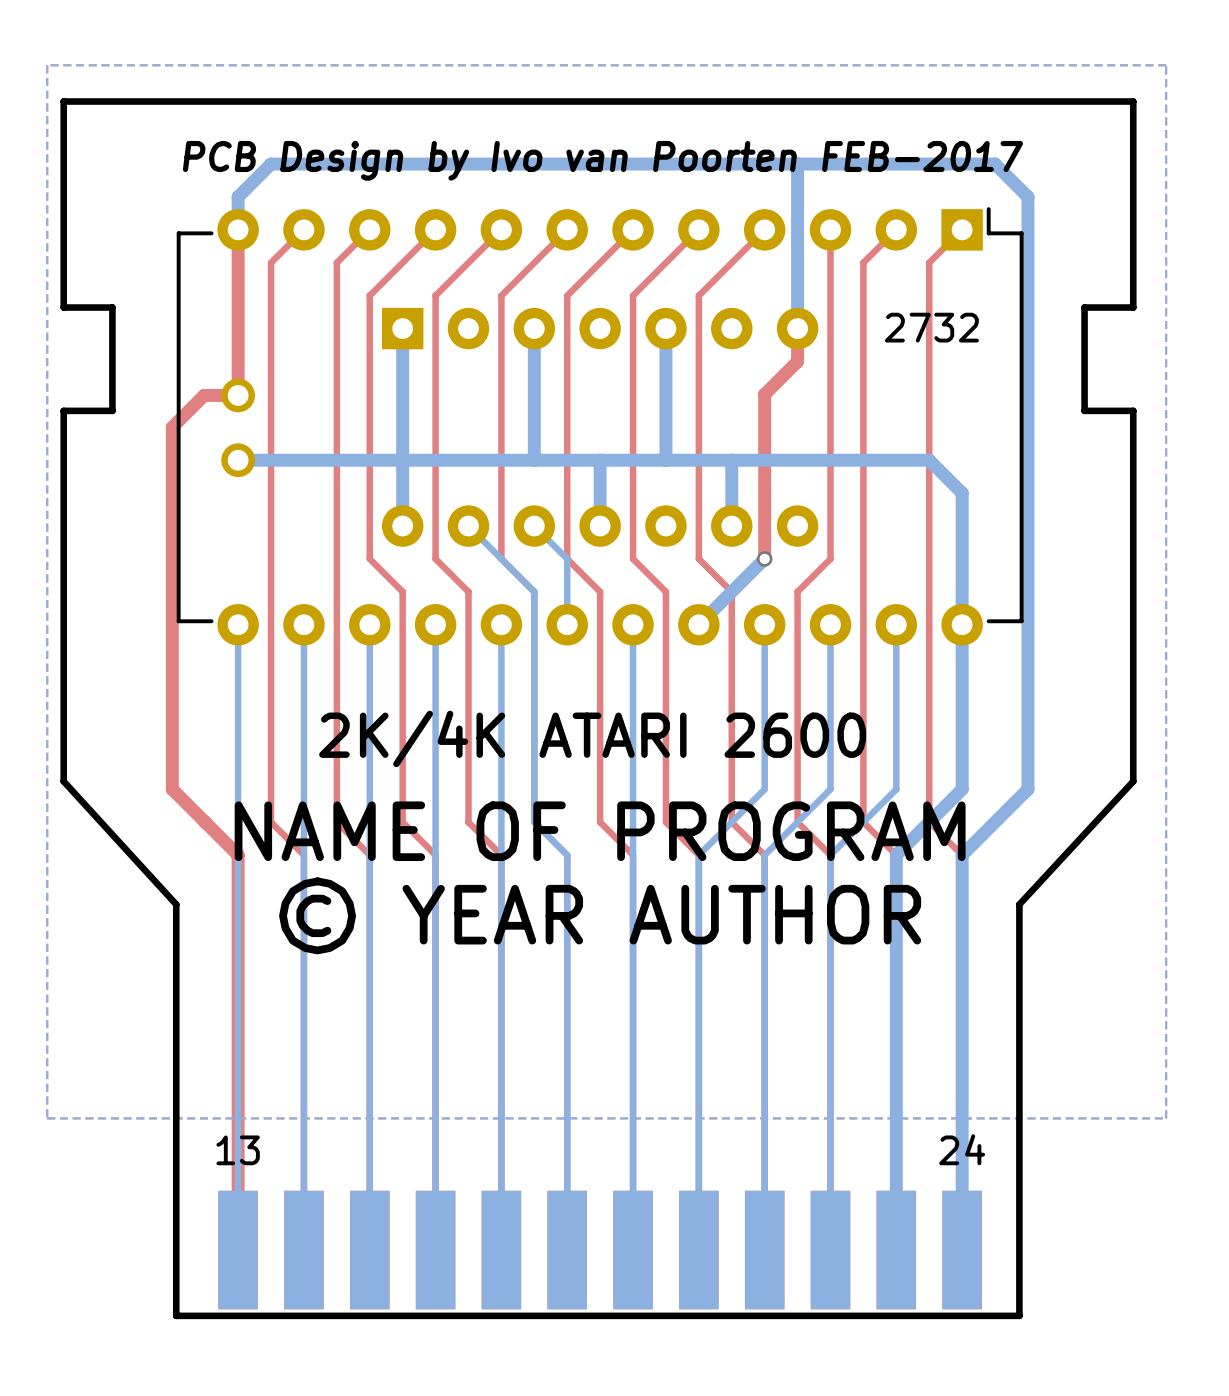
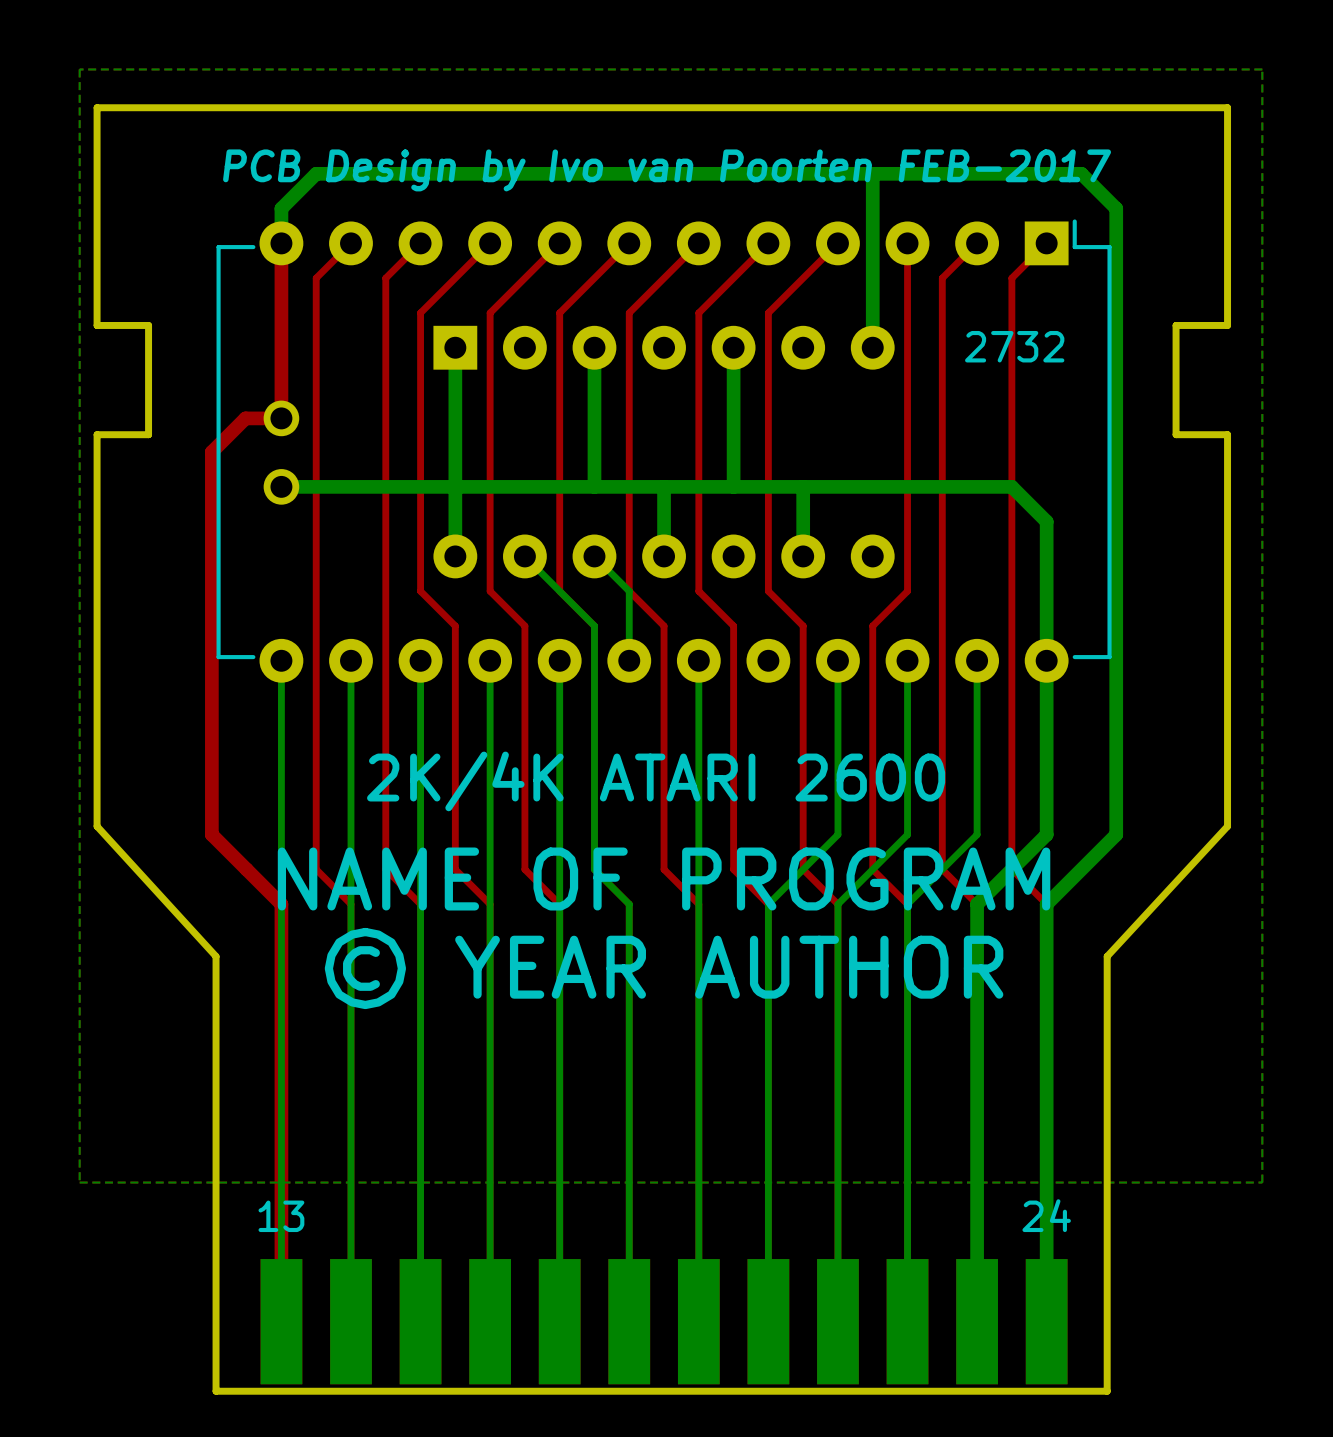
top track: (797, 328) (797, 361) (764, 394) (764, 558) -> none
bottom track: (764, 558) (698, 624) -> none
via: (764, 558) -> none

